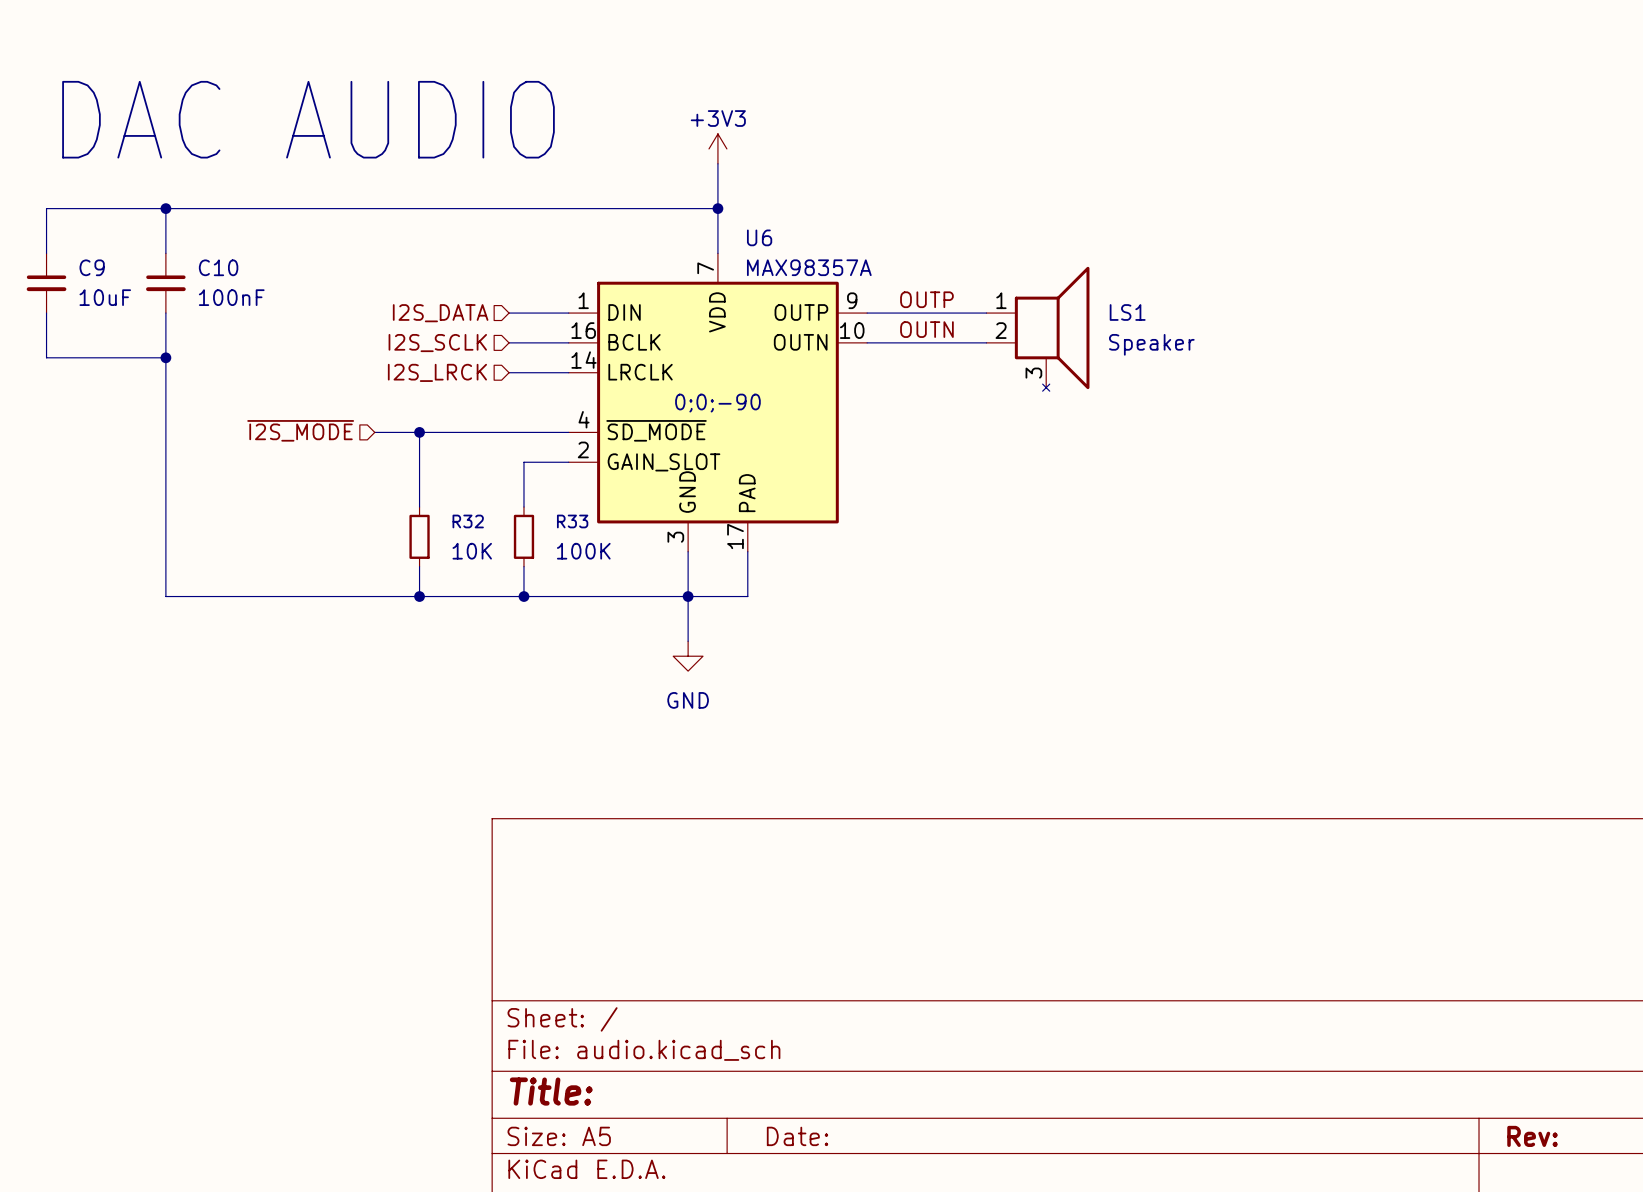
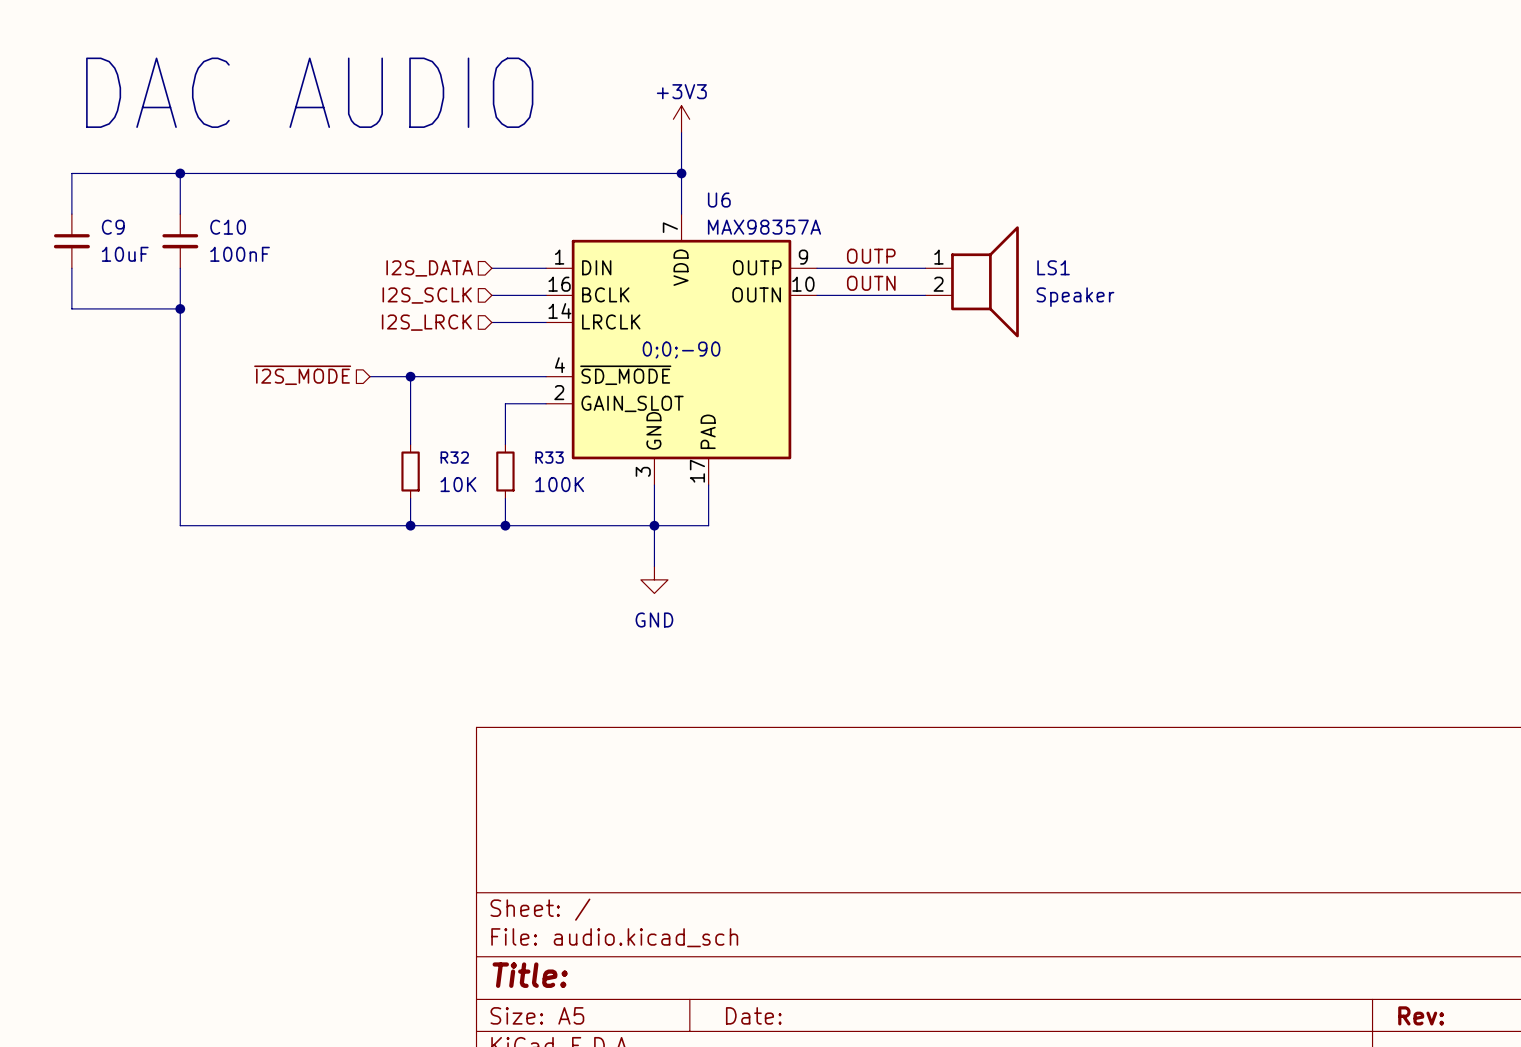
LS1 symbol: [986, 266, 1090, 392] -> [925, 226, 1019, 338]

